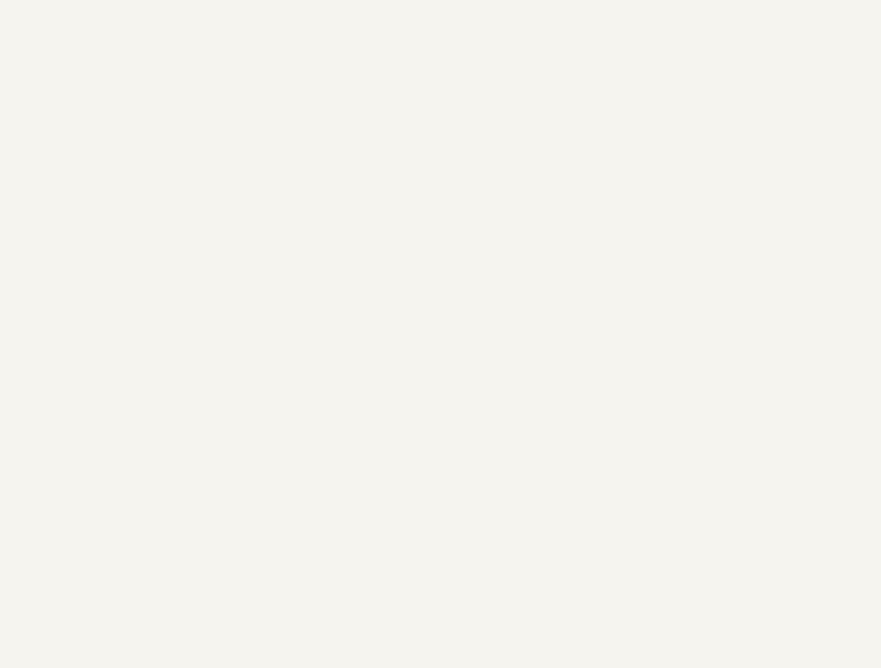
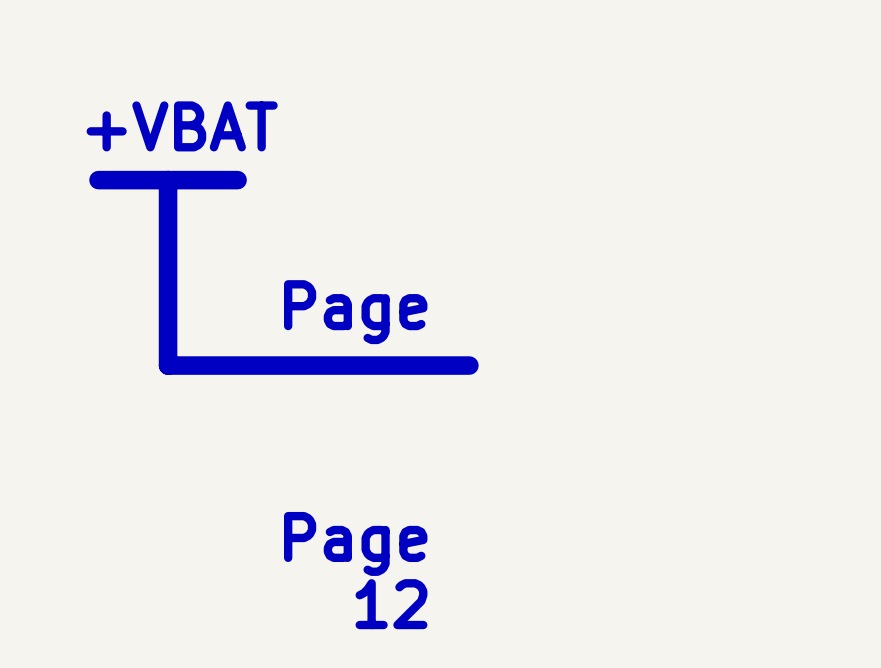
text: none -> +VBAT (182, 126)
line: none -> (98, 180) (237, 180)
line: none -> (168, 180) (168, 365) (469, 365)
text: none -> Page (355, 312)
text: none -> Page (355, 543)
text: none -> 12 (391, 604)

